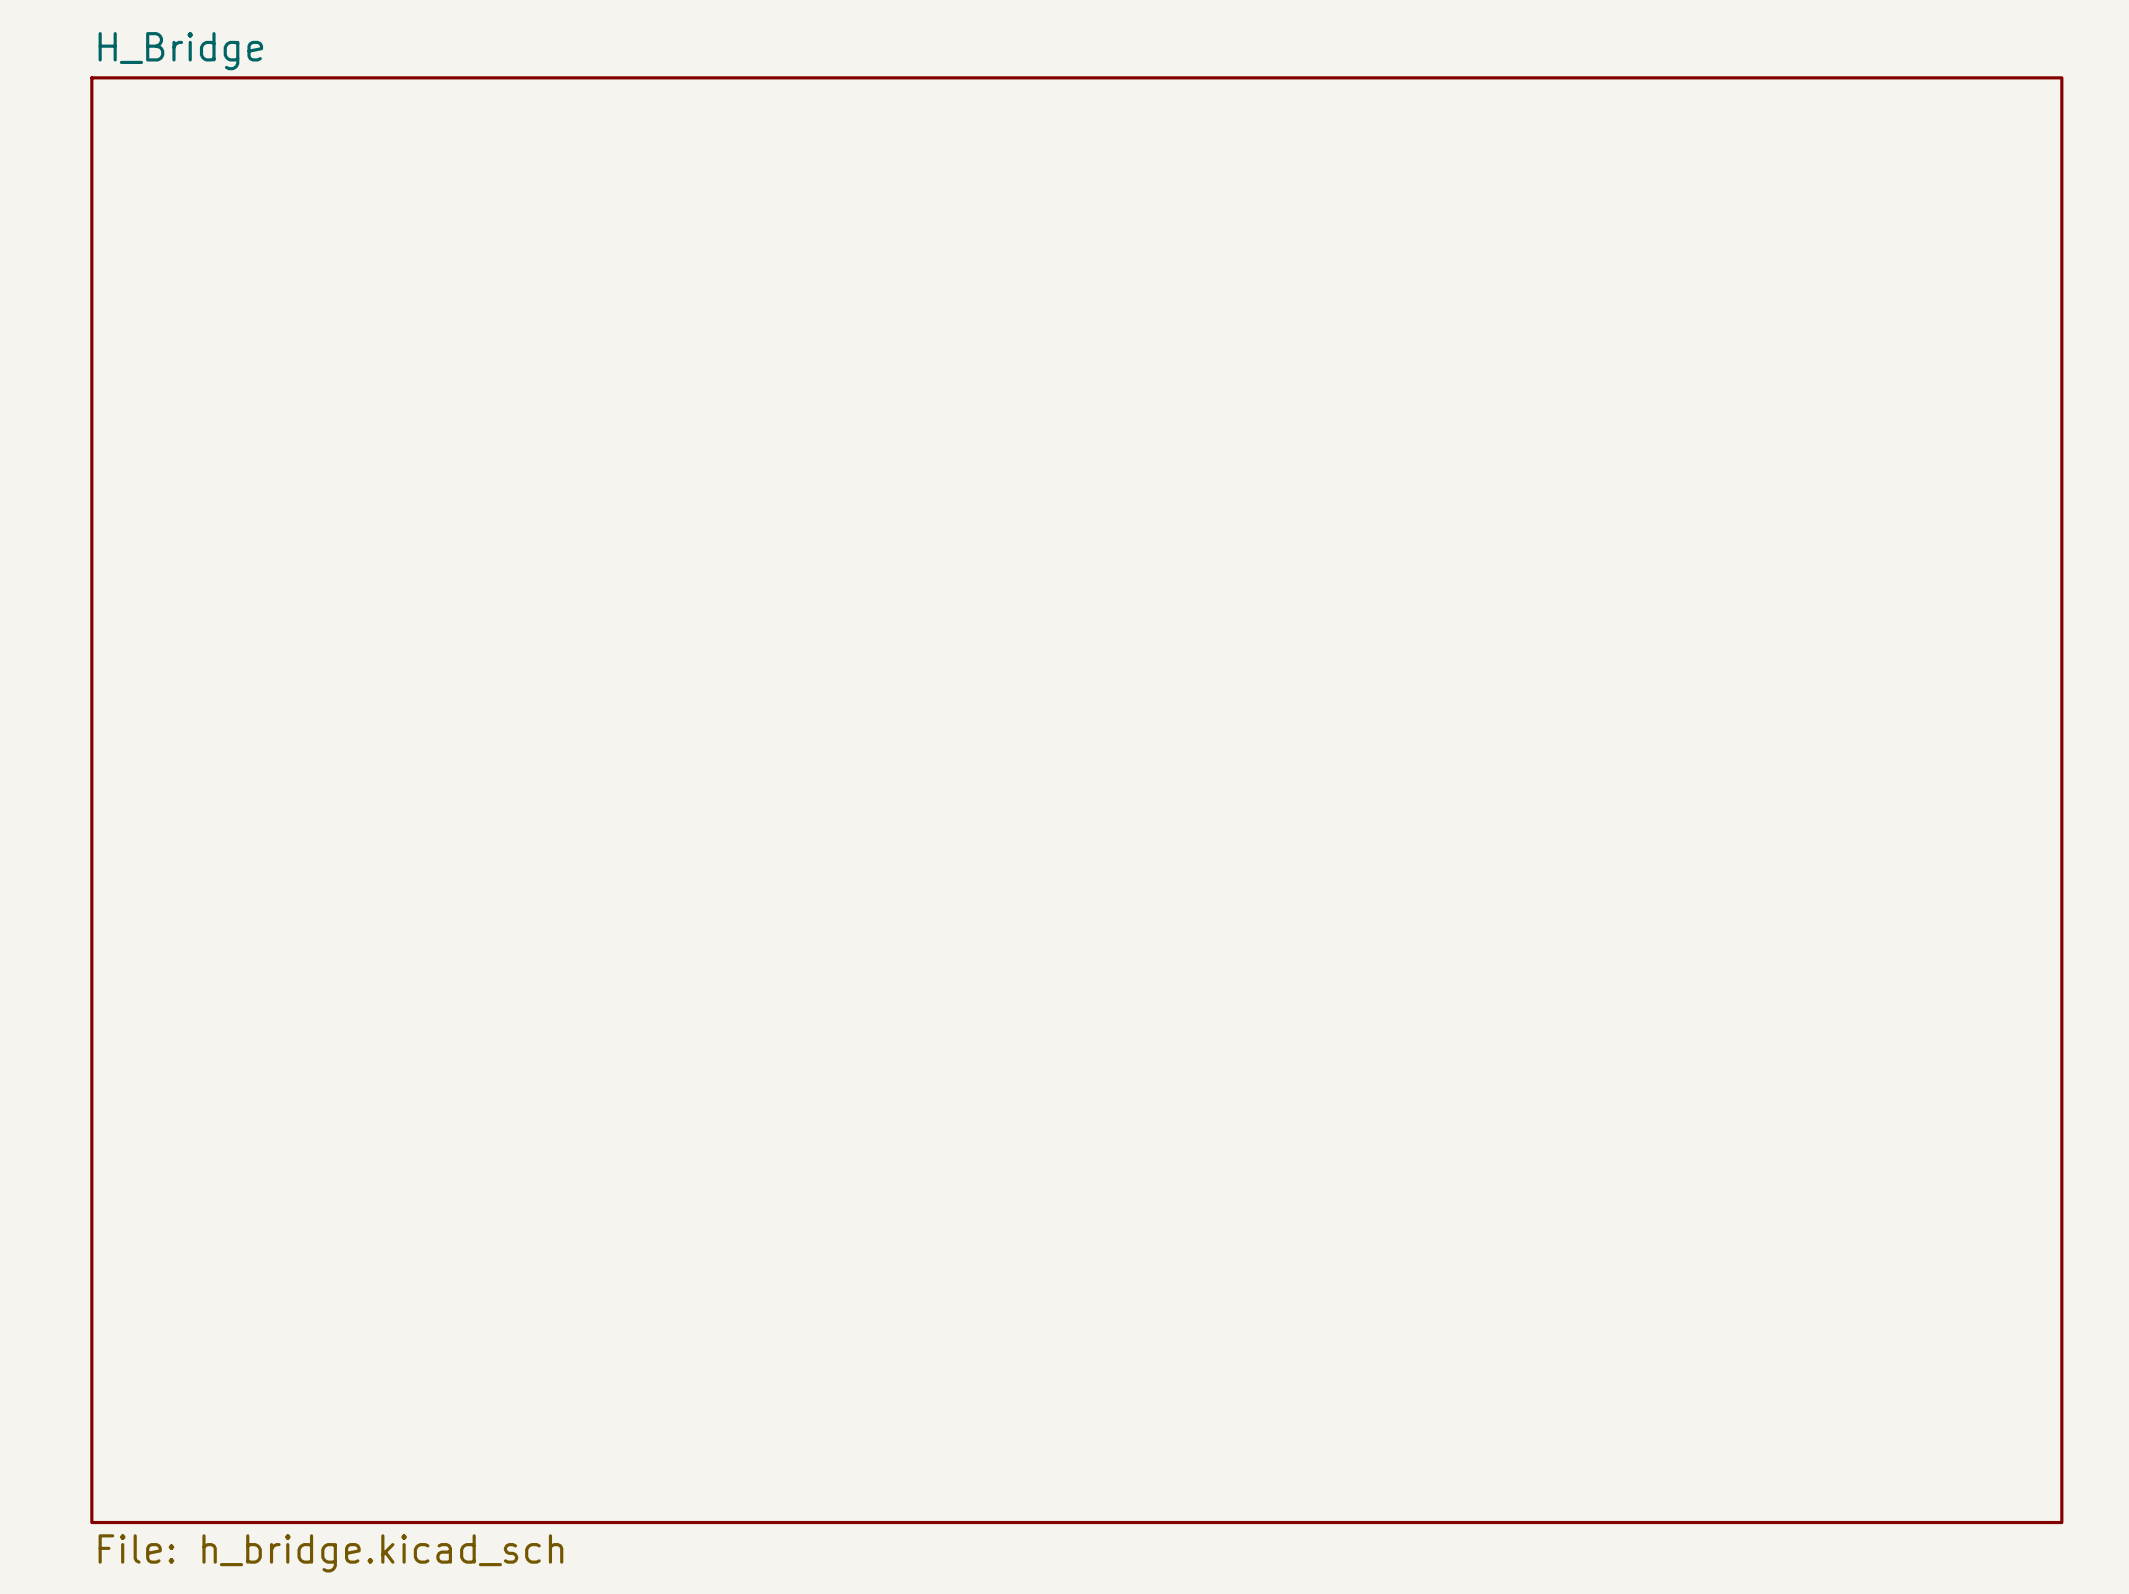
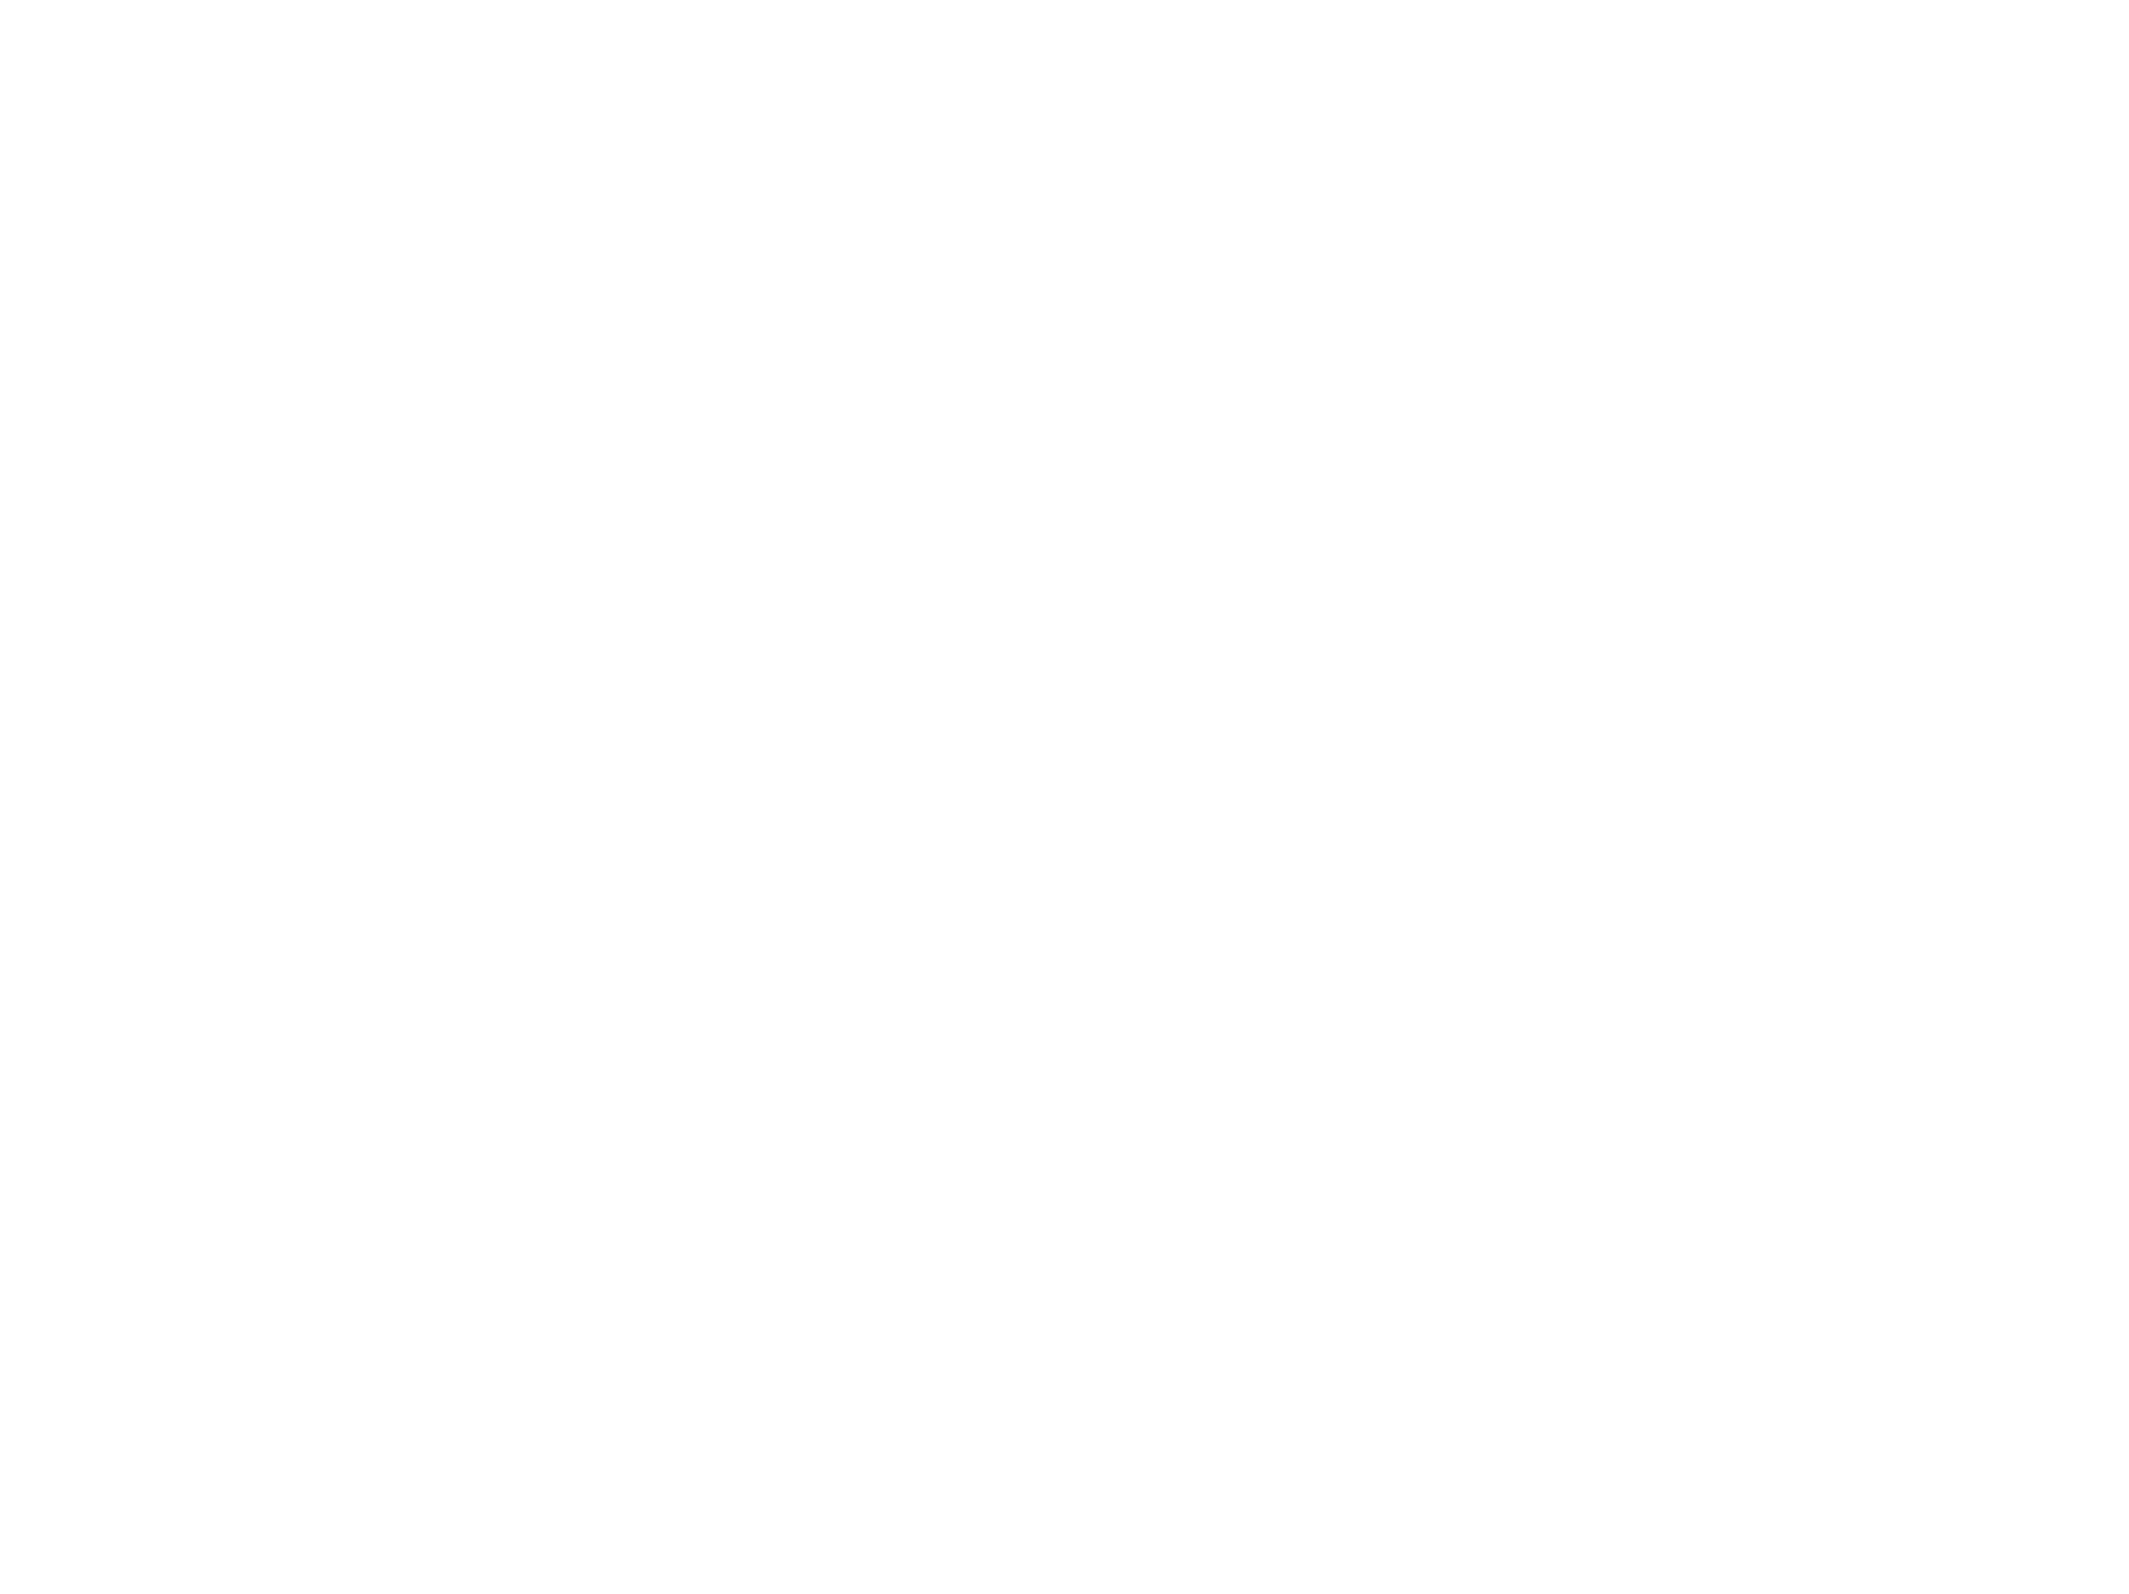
sheet H_Bridge: File: h_bridge.kicad_sch (1076, 800) -> none

